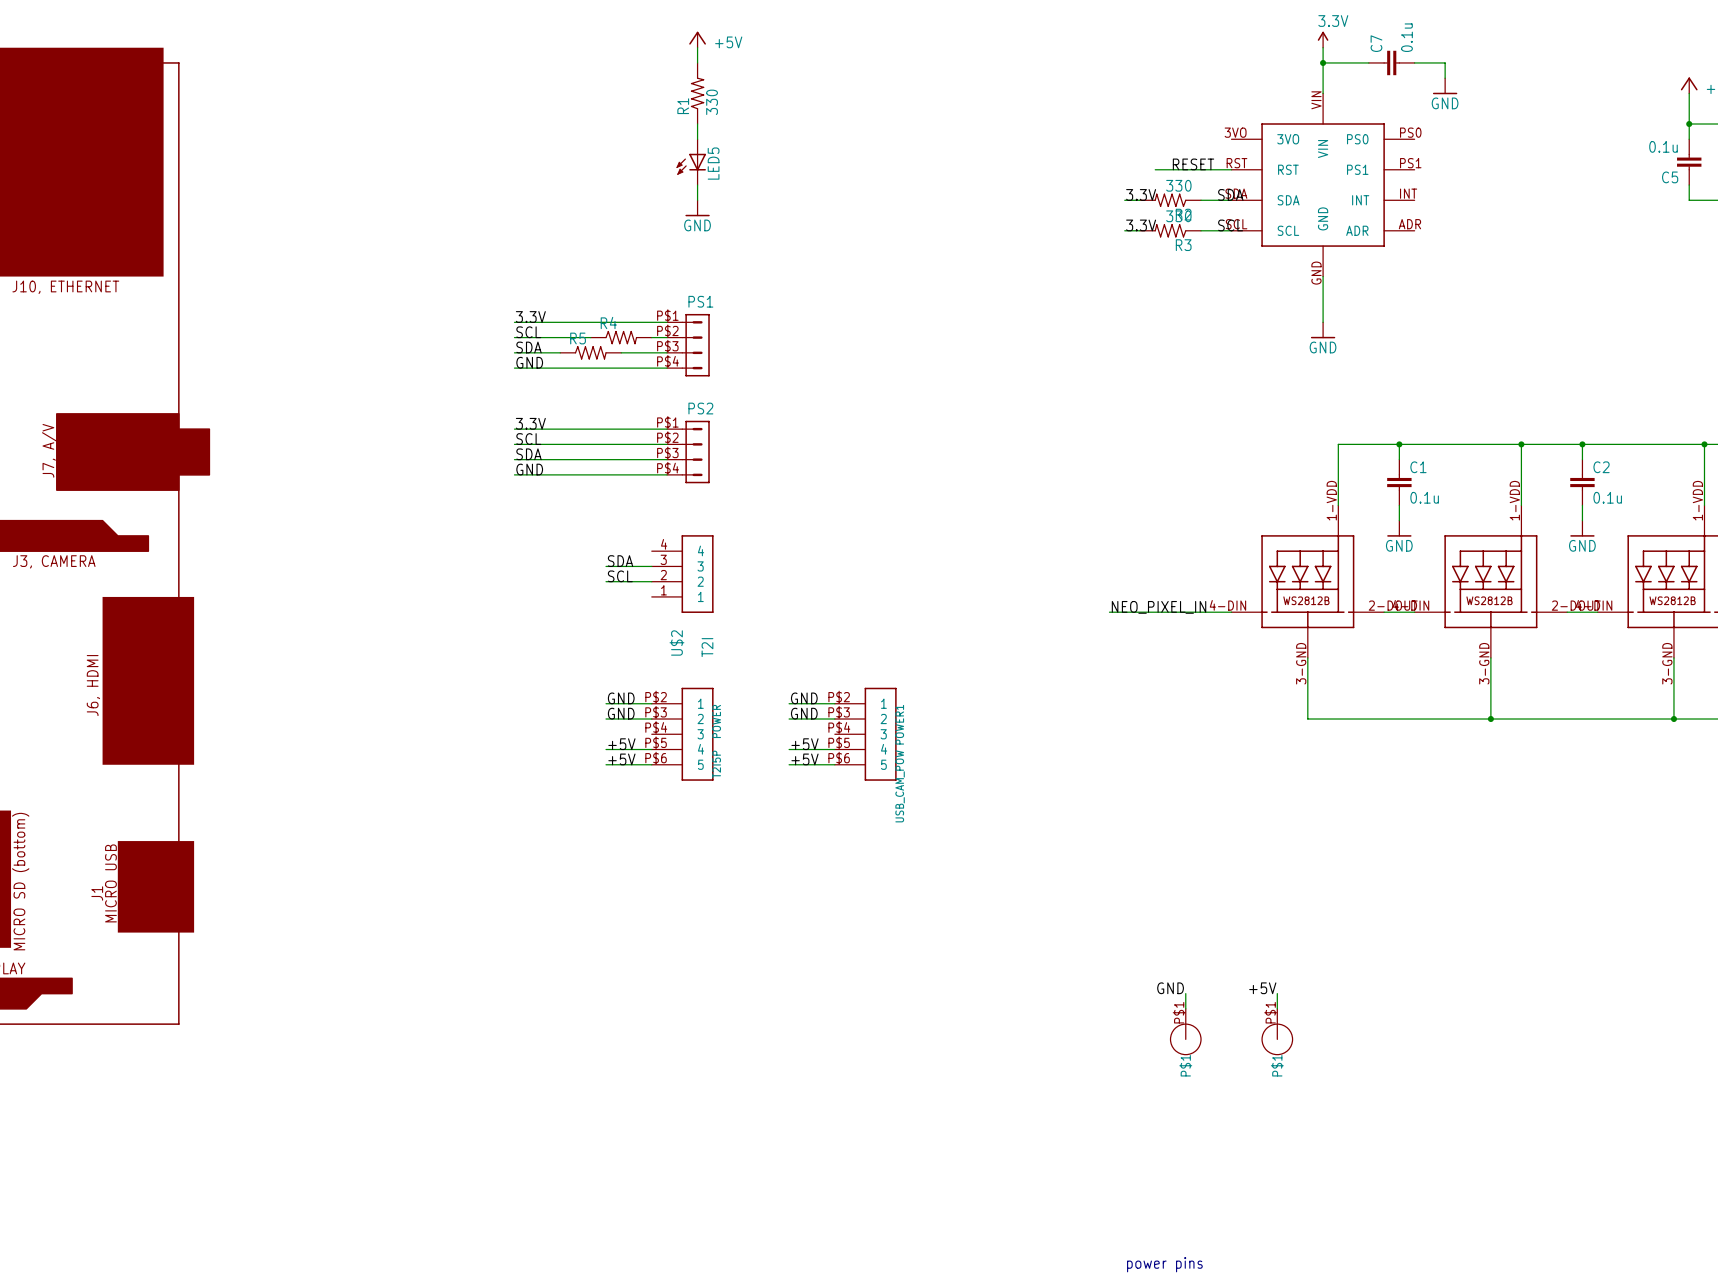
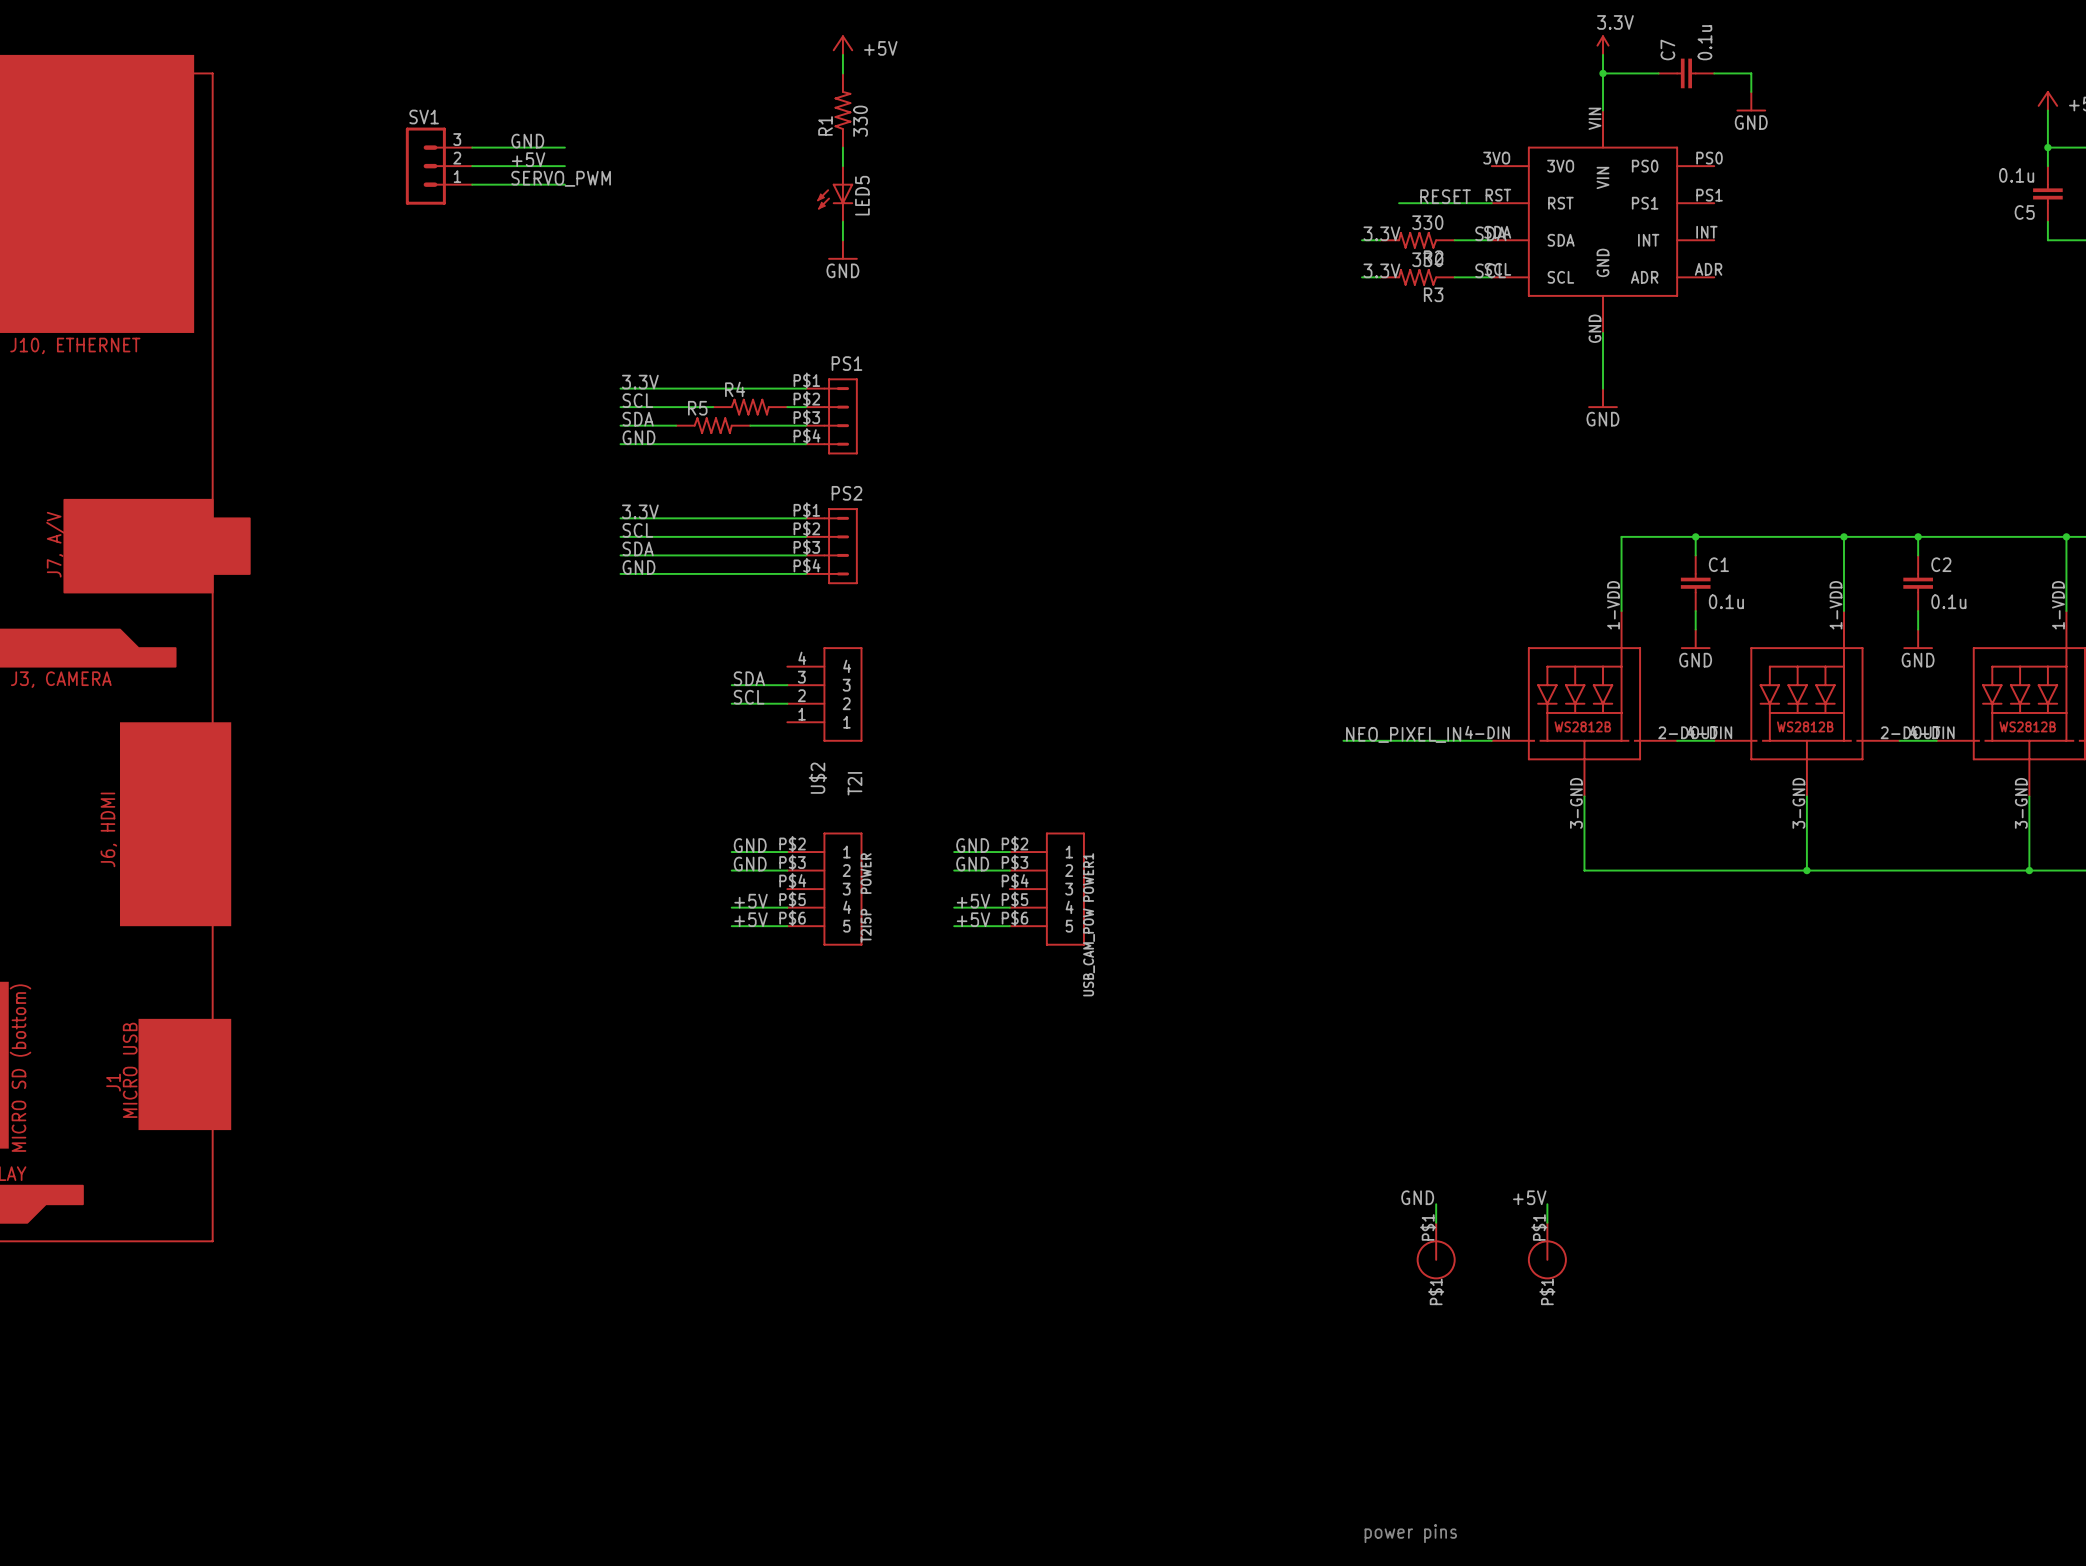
label: none -> GND (527, 141)
wire: none -> (472, 147) (564, 147)
label: none -> +5V (528, 159)
SV1: none -> (439, 166)
wire: none -> (472, 166) (564, 166)
label: none -> SERVO_PWM (561, 178)
wire: none -> (472, 184) (564, 184)

